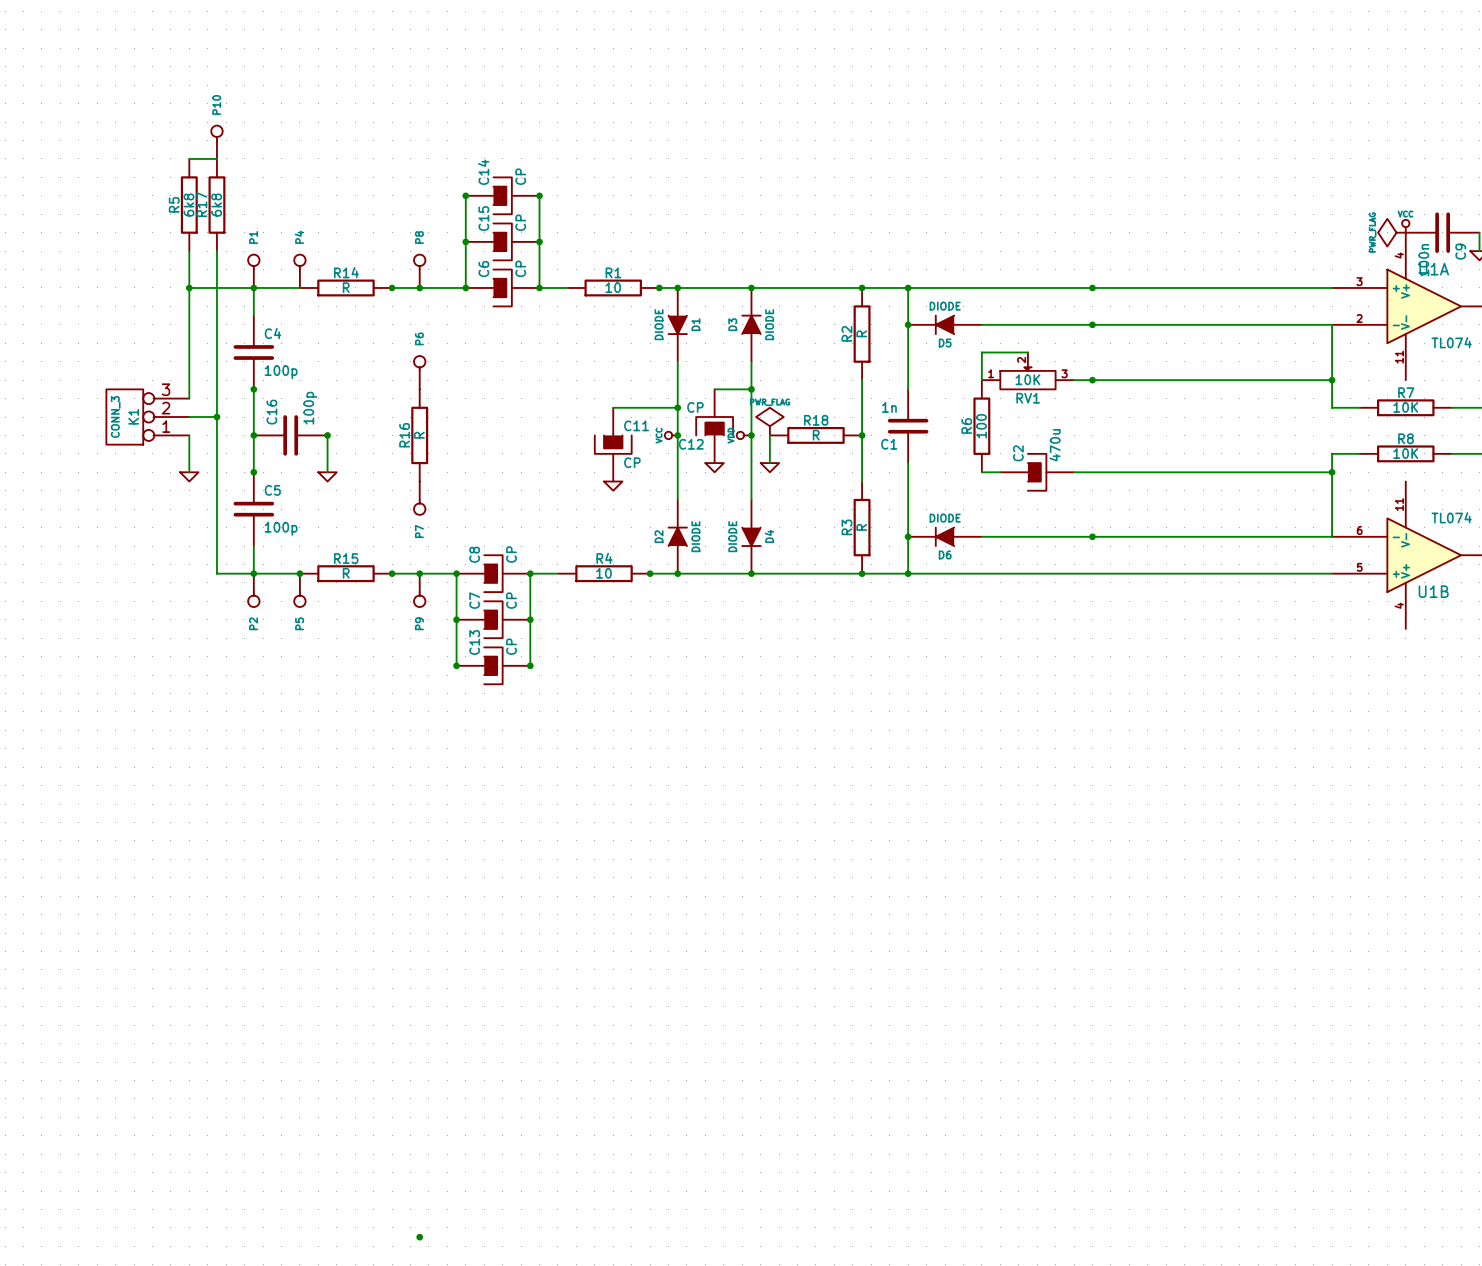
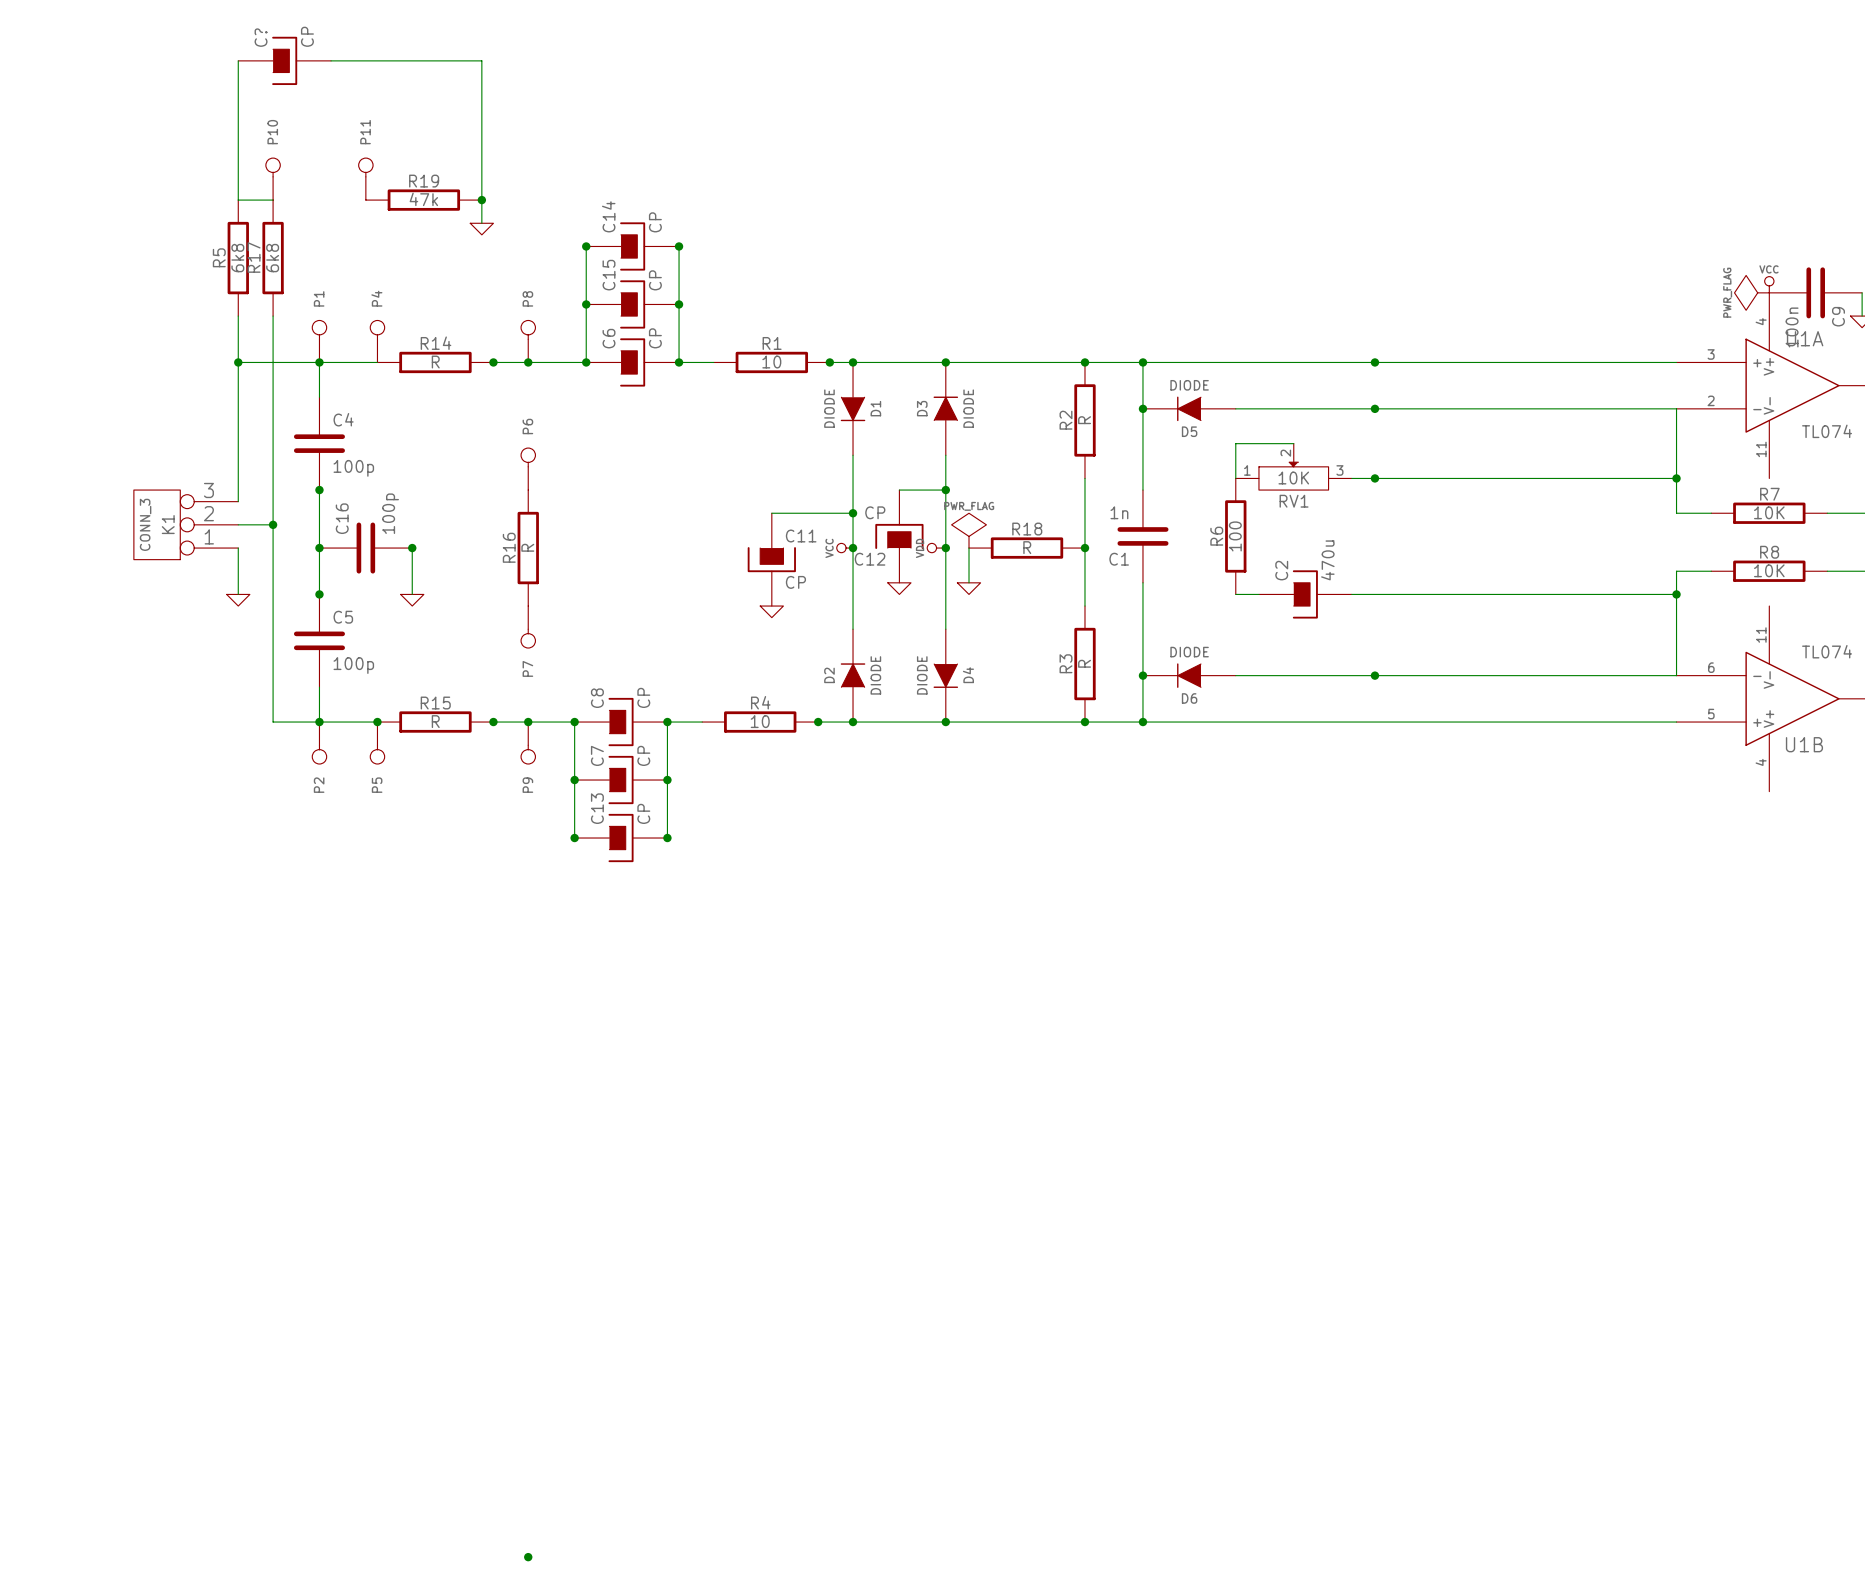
wire: none -> (238, 60) (238, 200)
C?: none -> CP (284, 60)
wire: none -> (331, 60) (481, 60) (481, 223)
P11: none -> (365, 179)
R19: none -> 47k (423, 200)
junction: none -> (481, 200)
power symbol: none -> (481, 229)

